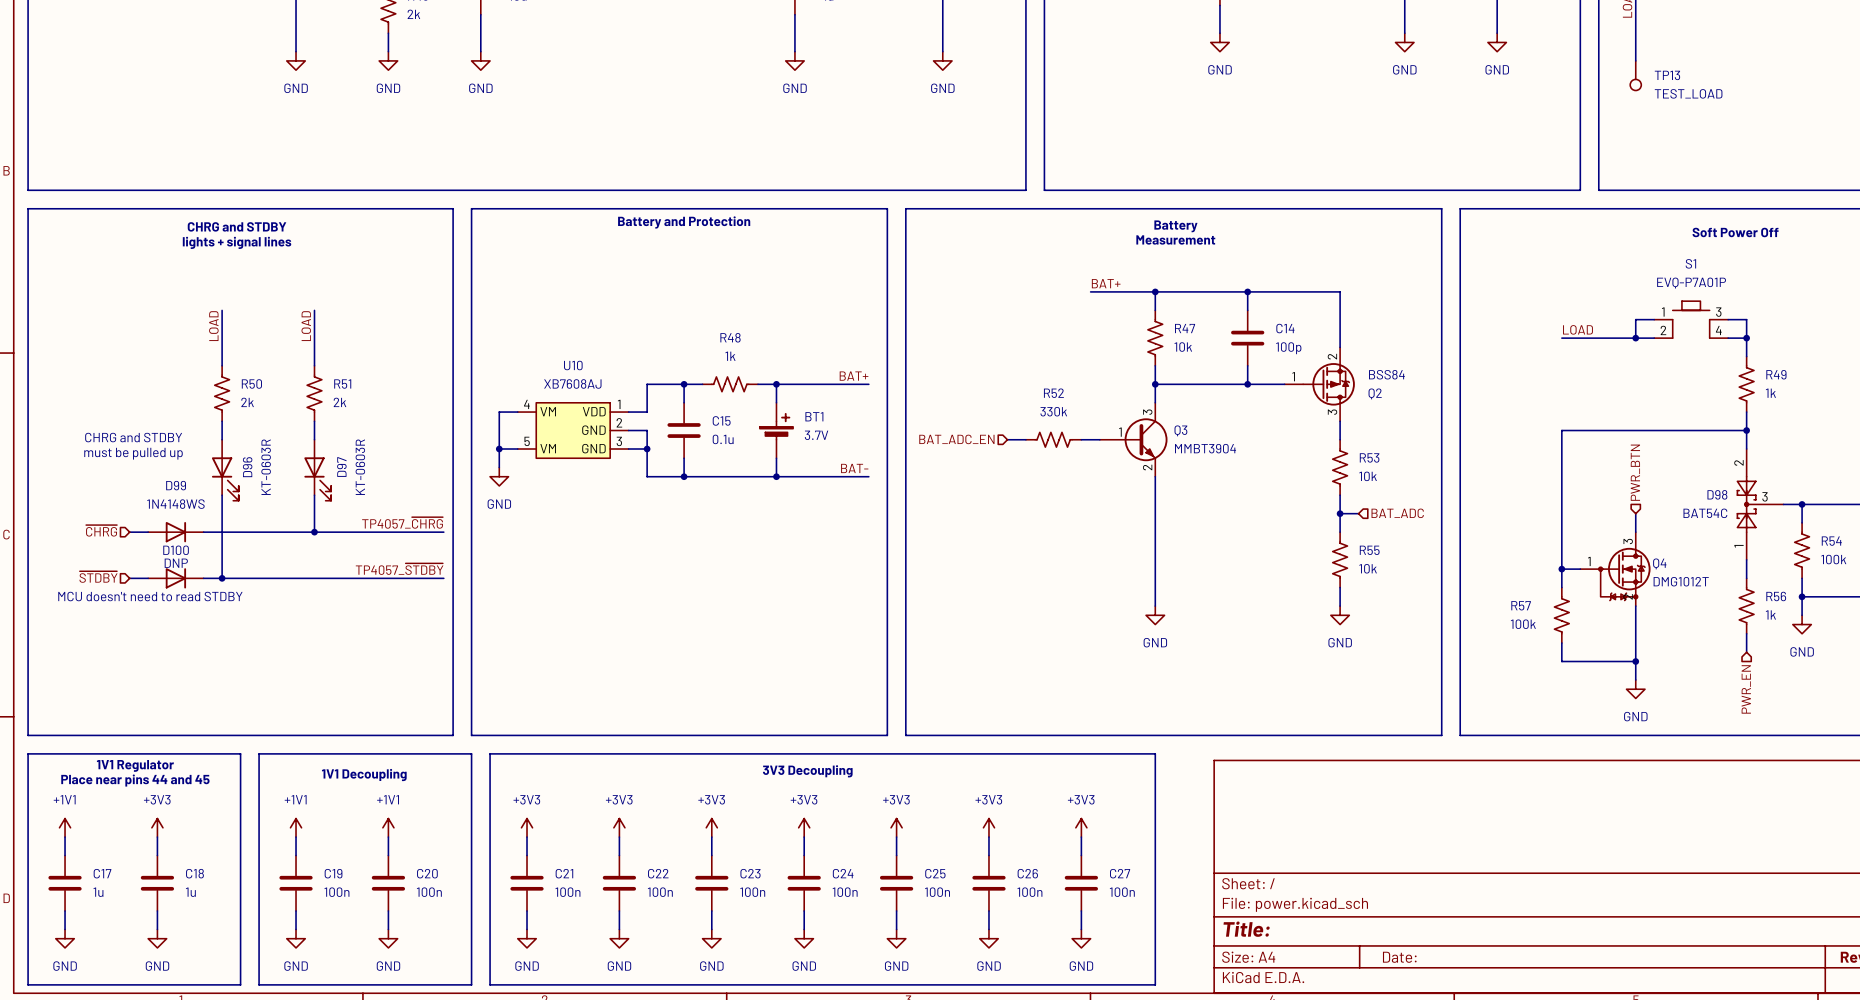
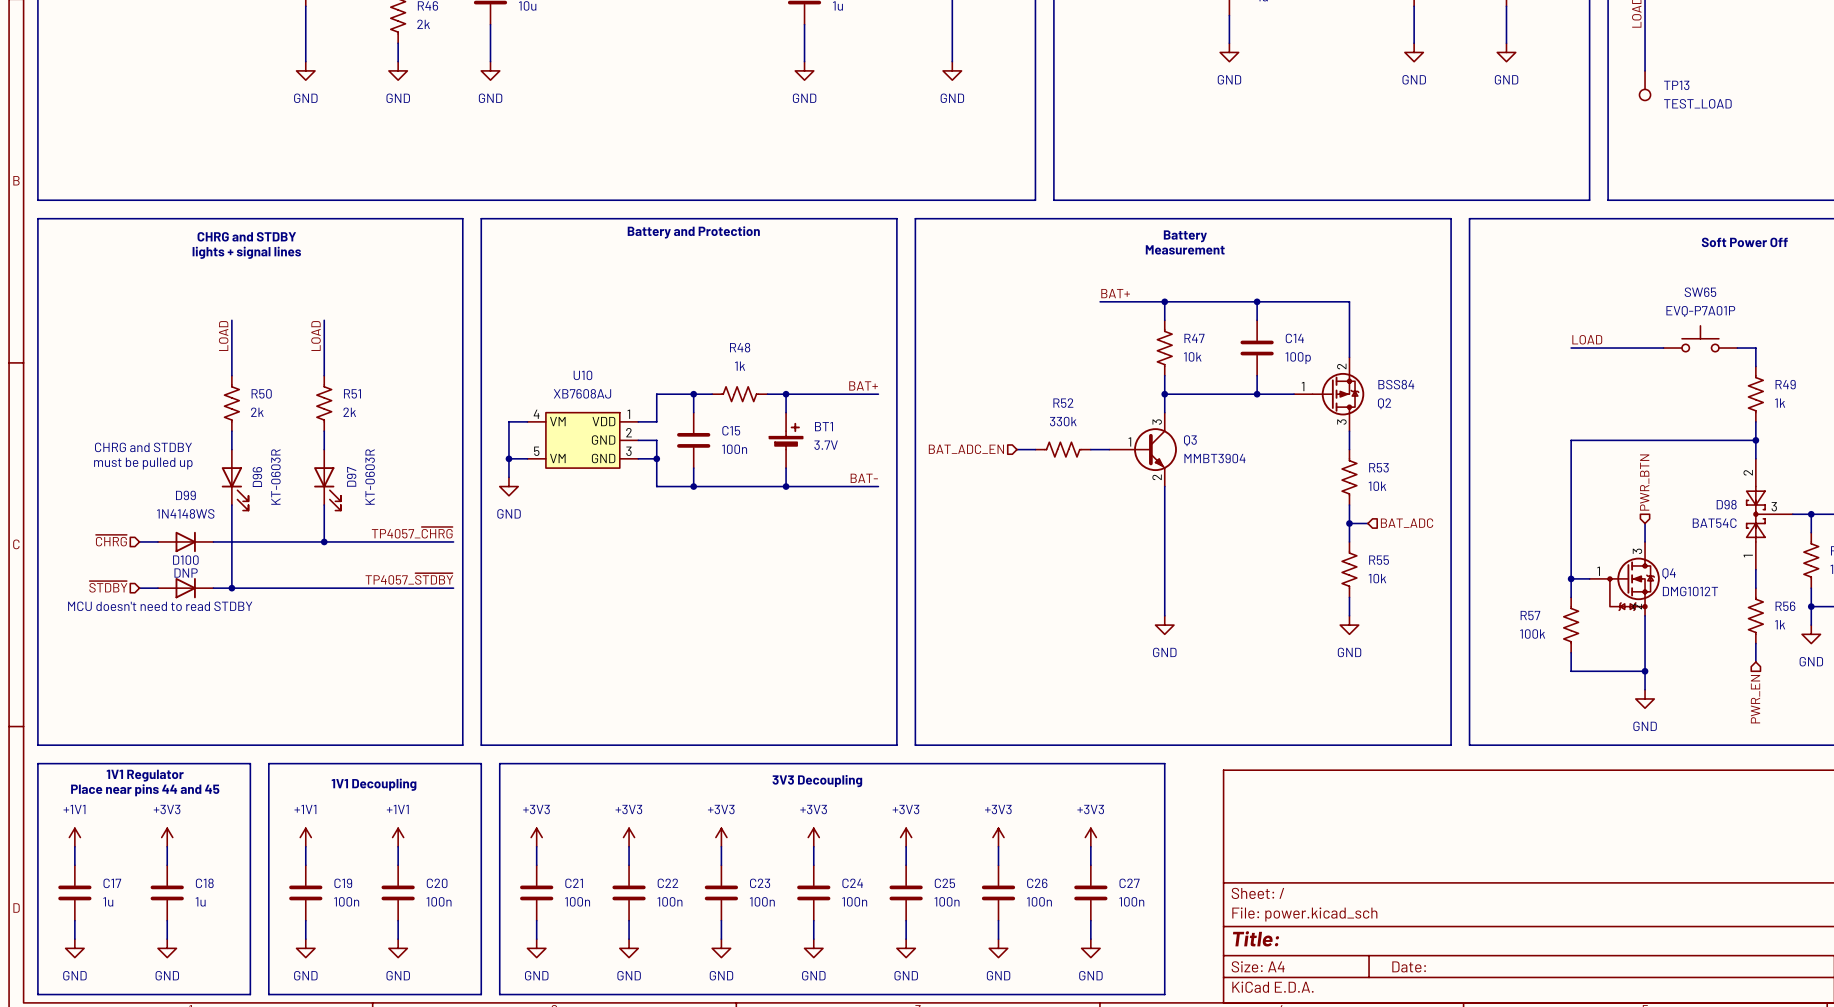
wire: (1654, 319) (1635, 319) (1635, 338) -> none
S1: EVQ-P7A01P (1691, 319) -> none
wire: (1728, 319) (1746, 319) (1746, 338) -> none
SW65: none -> EVQ-P7A01P (1700, 338)
junction: (1635, 338) -> none
junction: (1746, 338) -> none
C15 value: 0.1u (723, 439) -> 100n (734, 449)

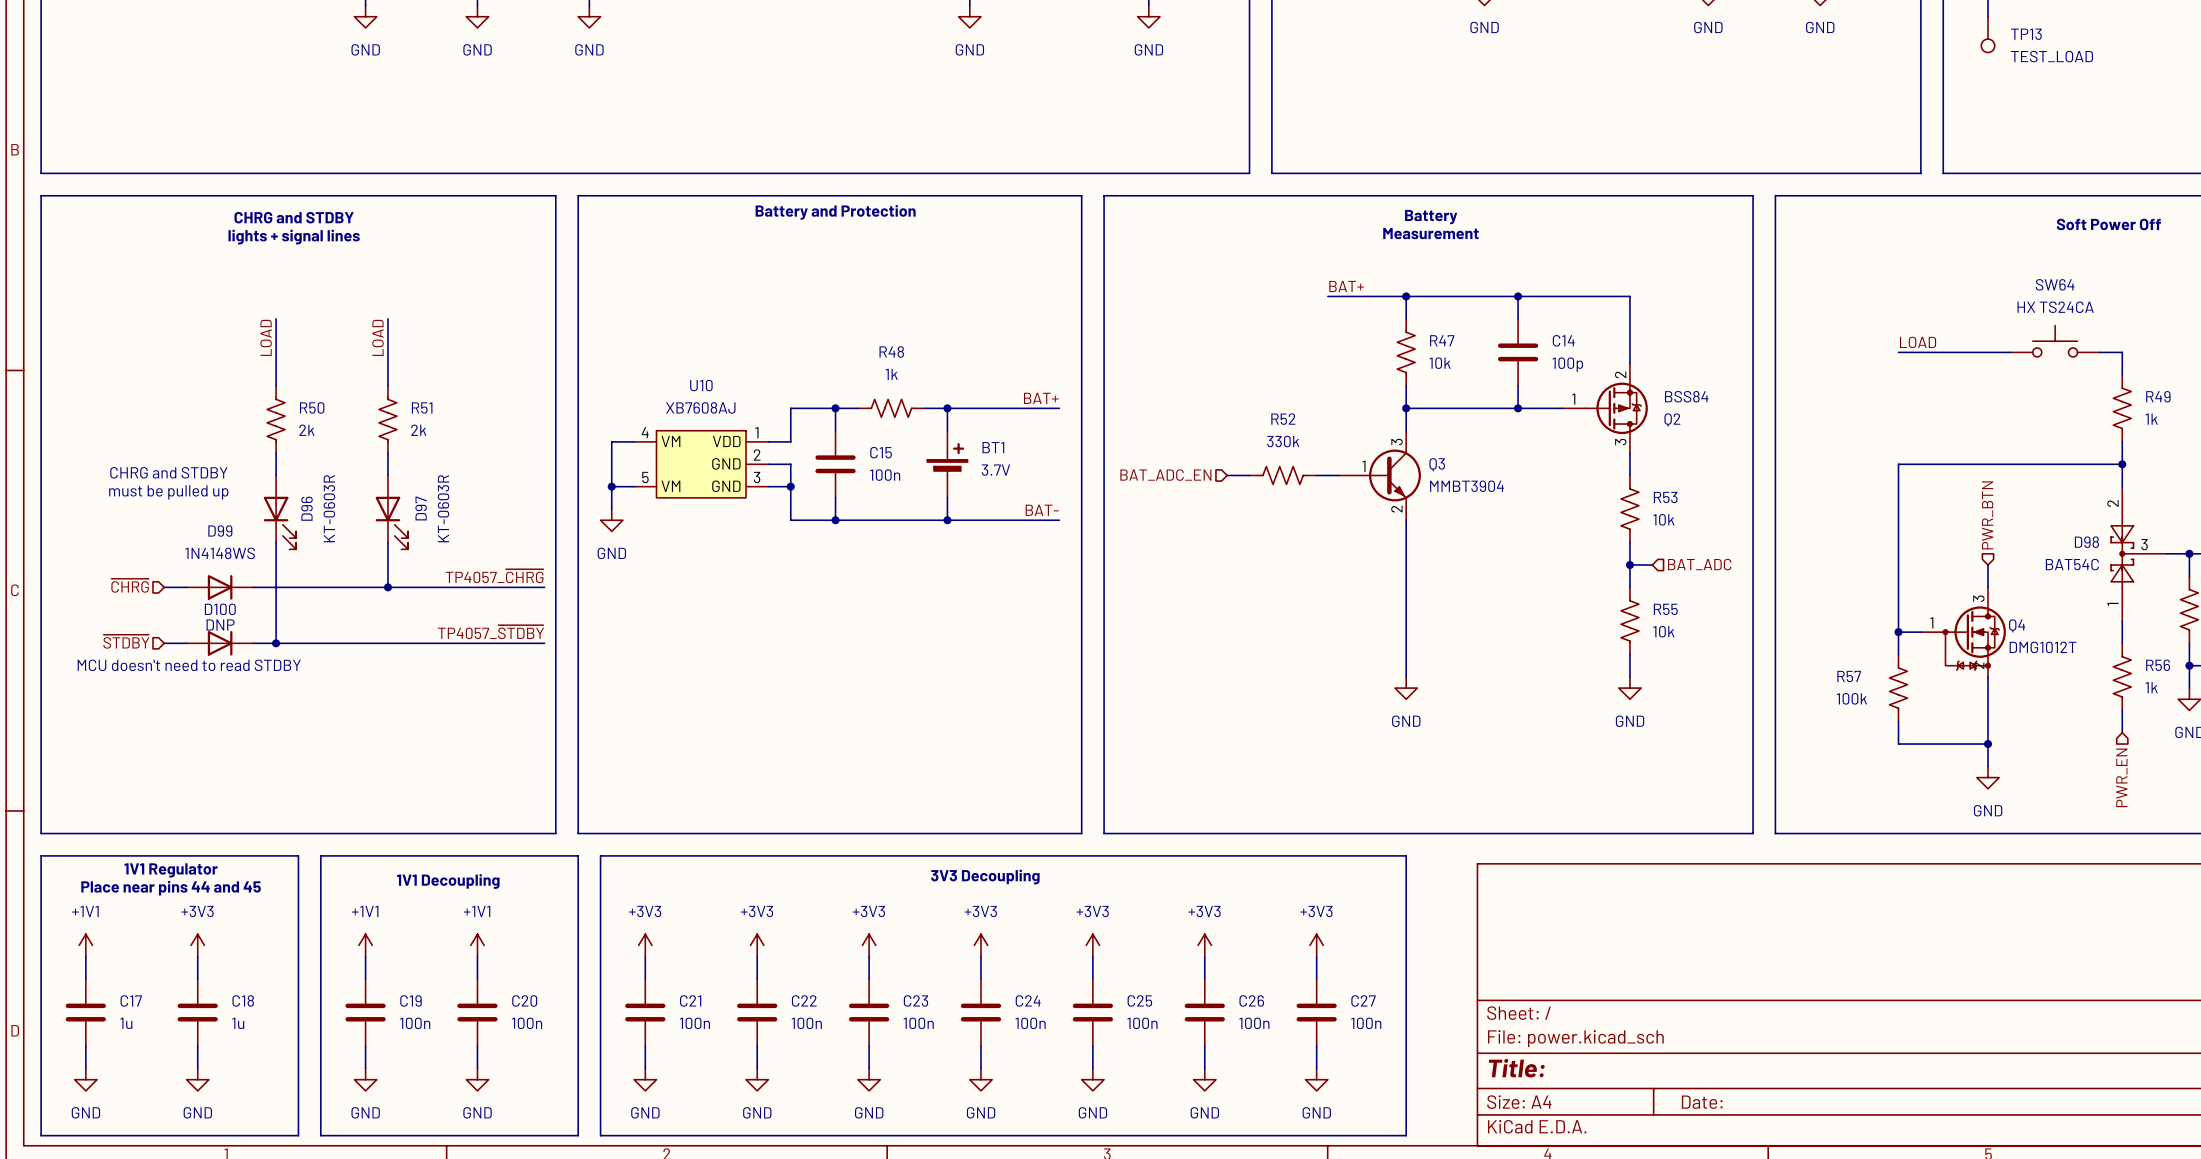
SW65 name: SW65 (1700, 292) -> SW64 (2055, 284)
SW65 value: EVQ-P7A01P (1700, 311) -> HX TS24CA (2055, 307)

